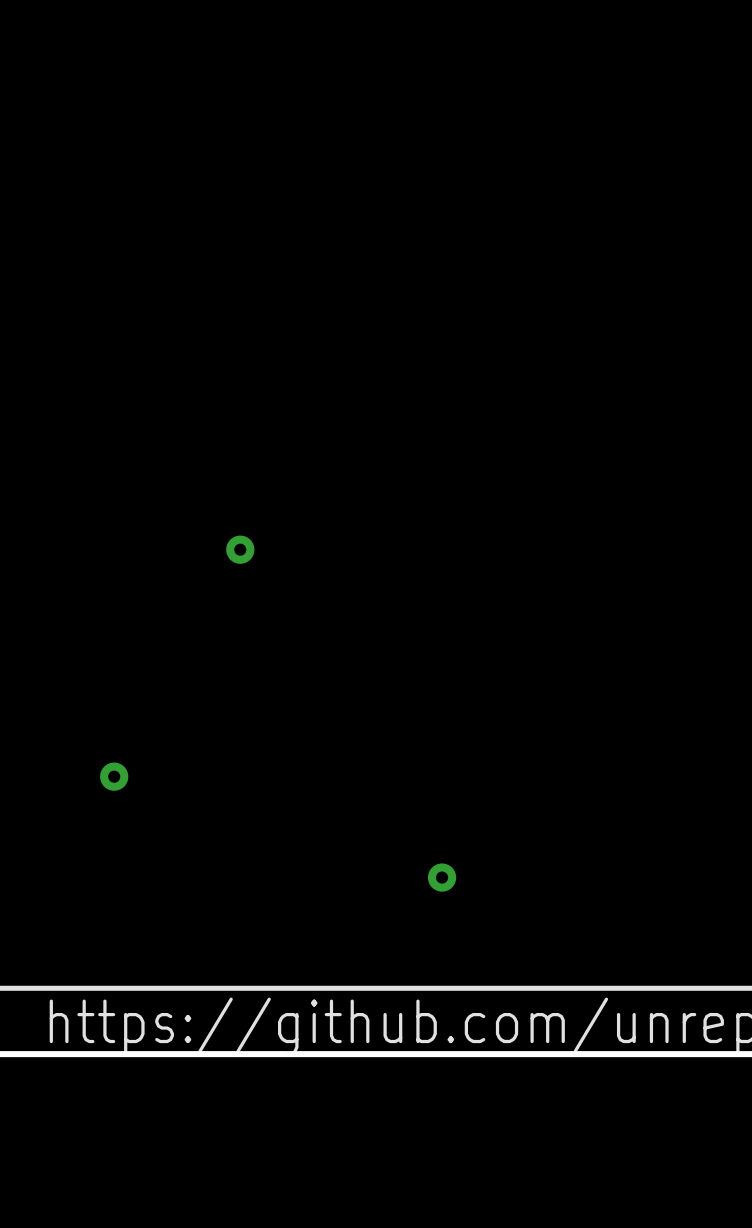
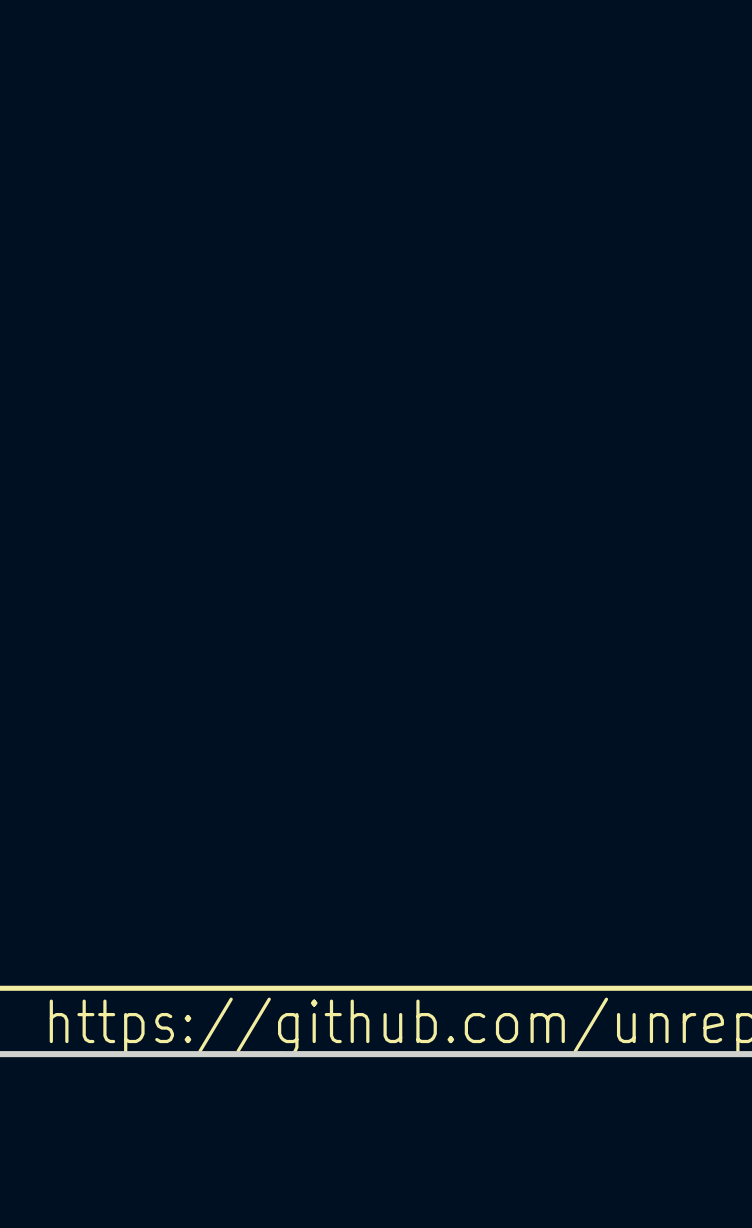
via: (240, 549) -> none
via: (114, 776) -> none
via: (442, 877) -> none

